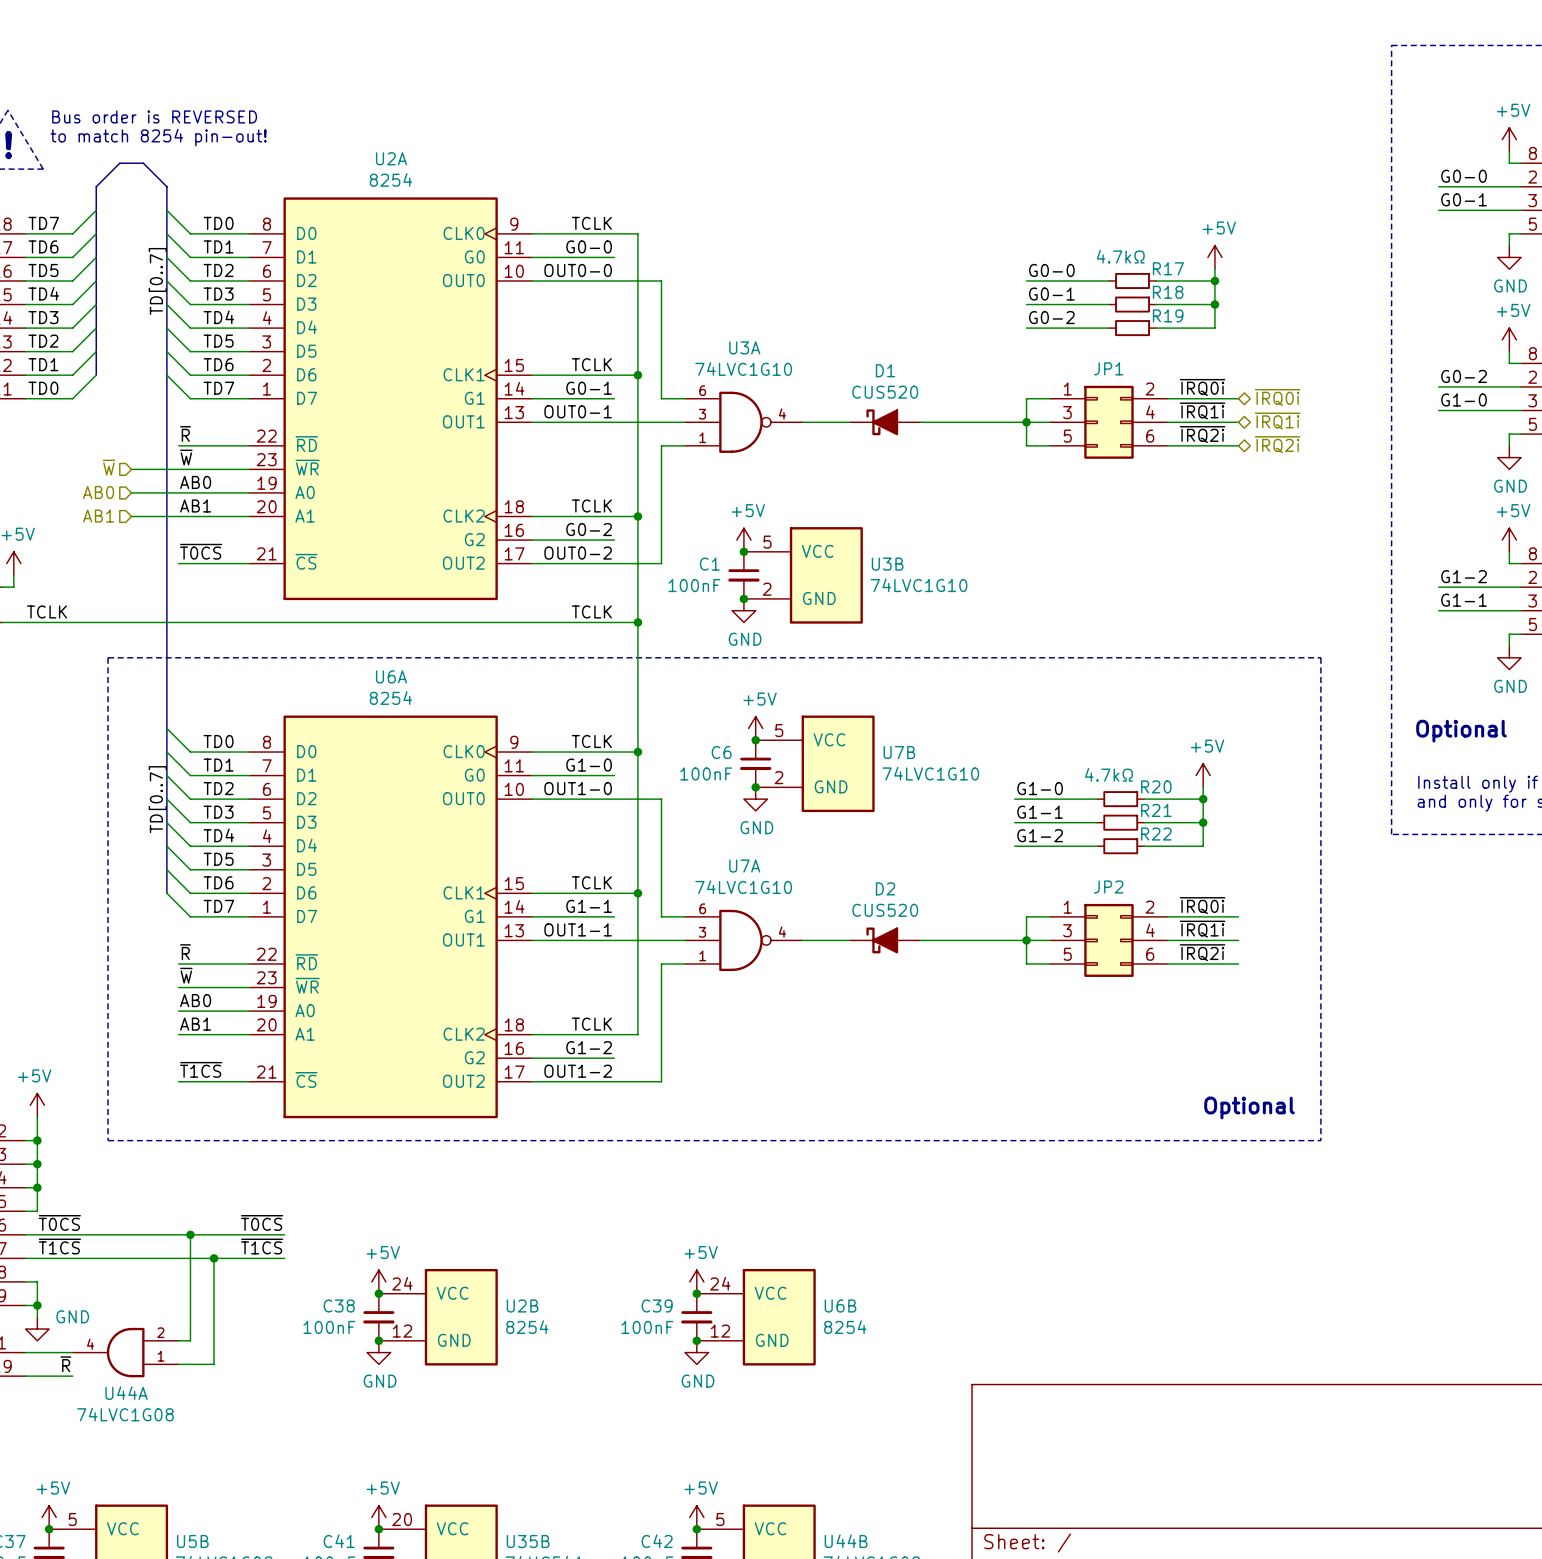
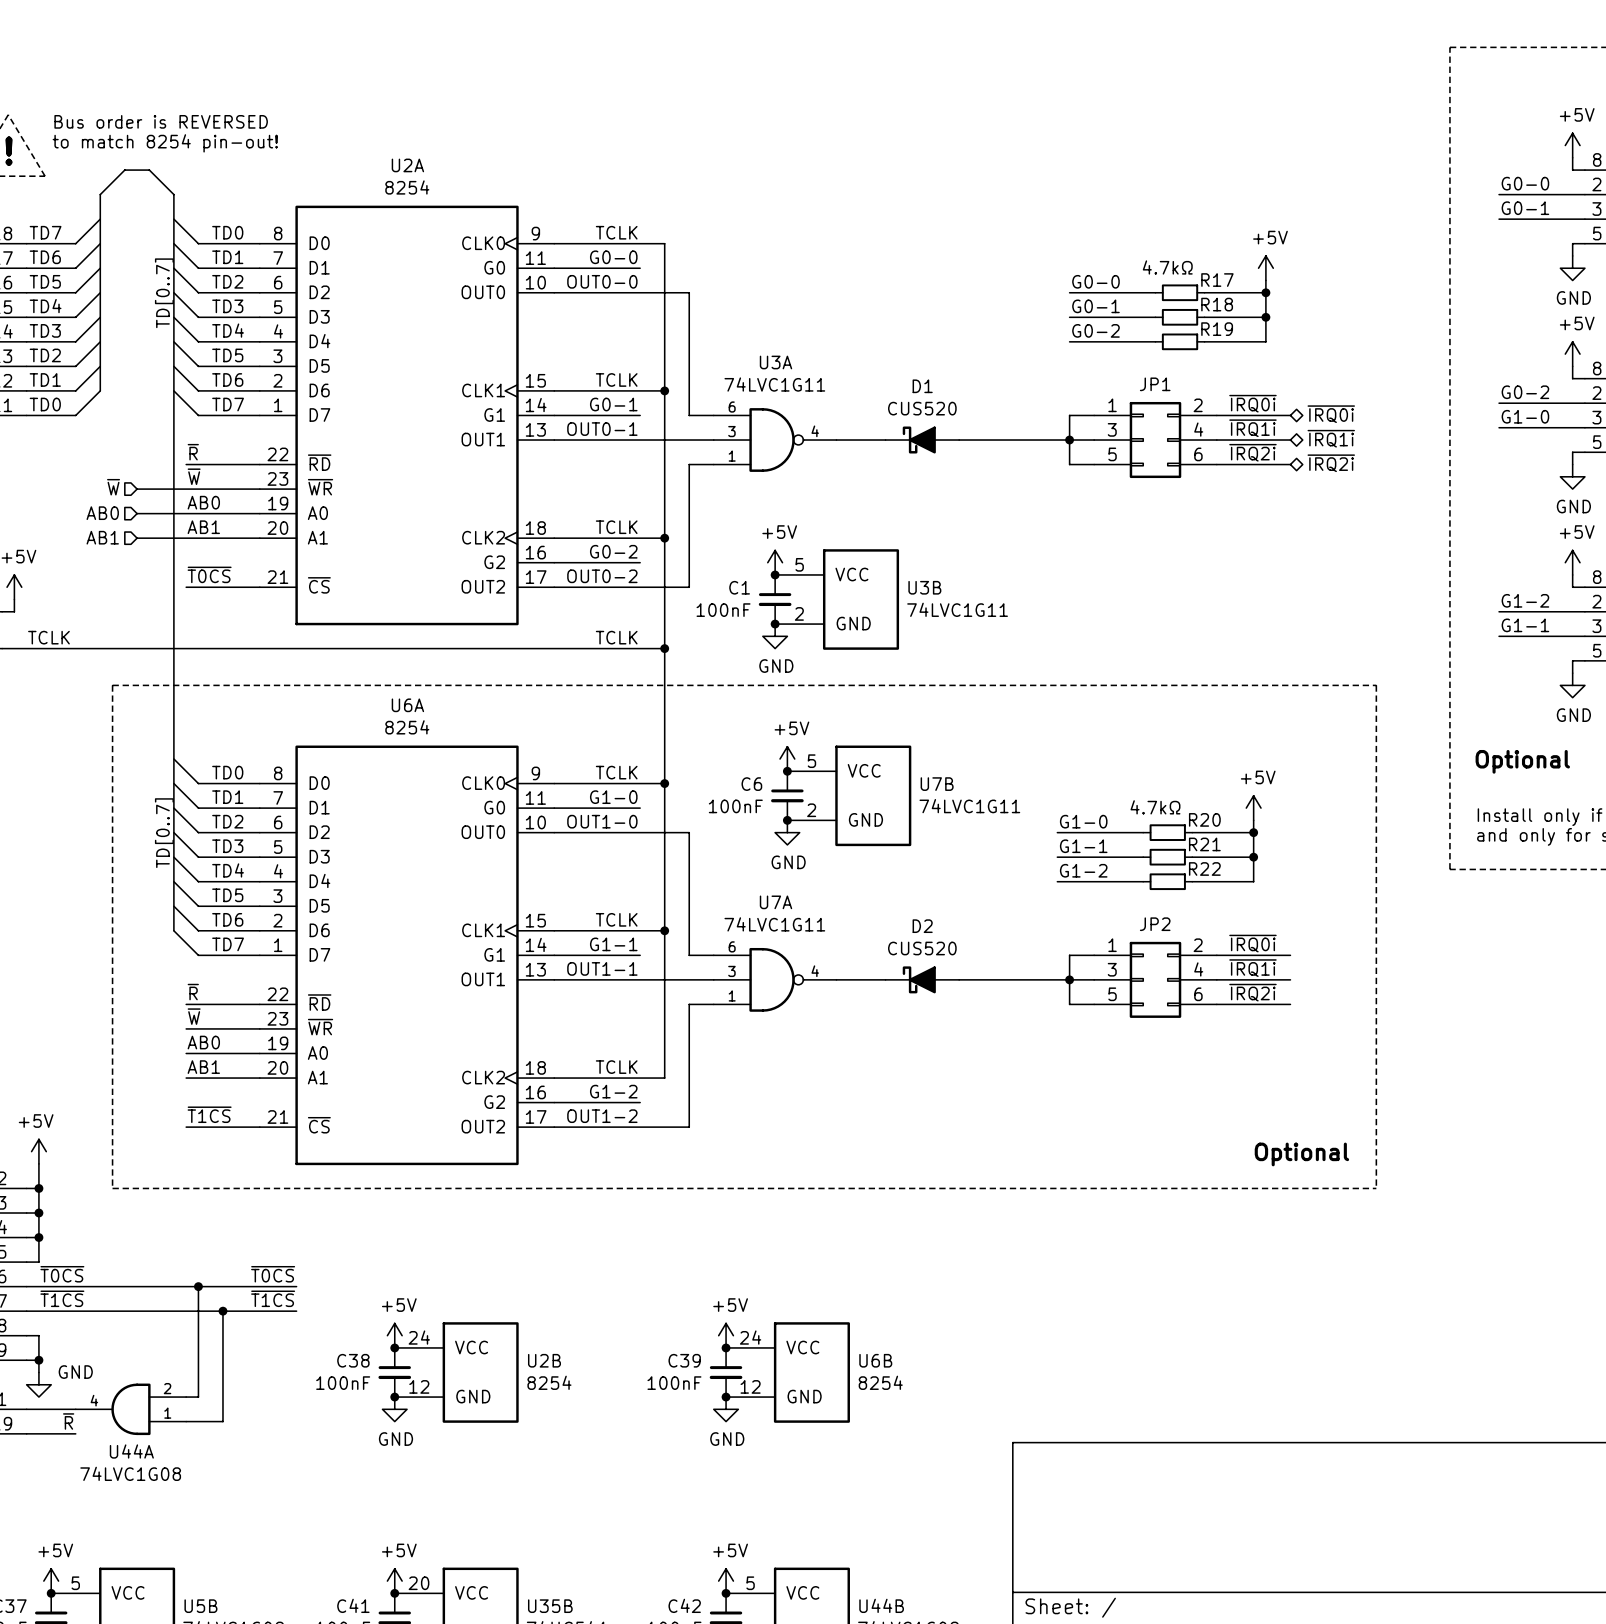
U3A value: 74LVC1G10 (743, 369) -> 74LVC1G11 (774, 384)
U3B value: 74LVC1G10 (919, 585) -> 74LVC1G11 (957, 609)
U7B value: 74LVC1G10 (930, 773) -> 74LVC1G11 (969, 806)
U7A value: 74LVC1G10 (743, 887) -> 74LVC1G11 (774, 924)

